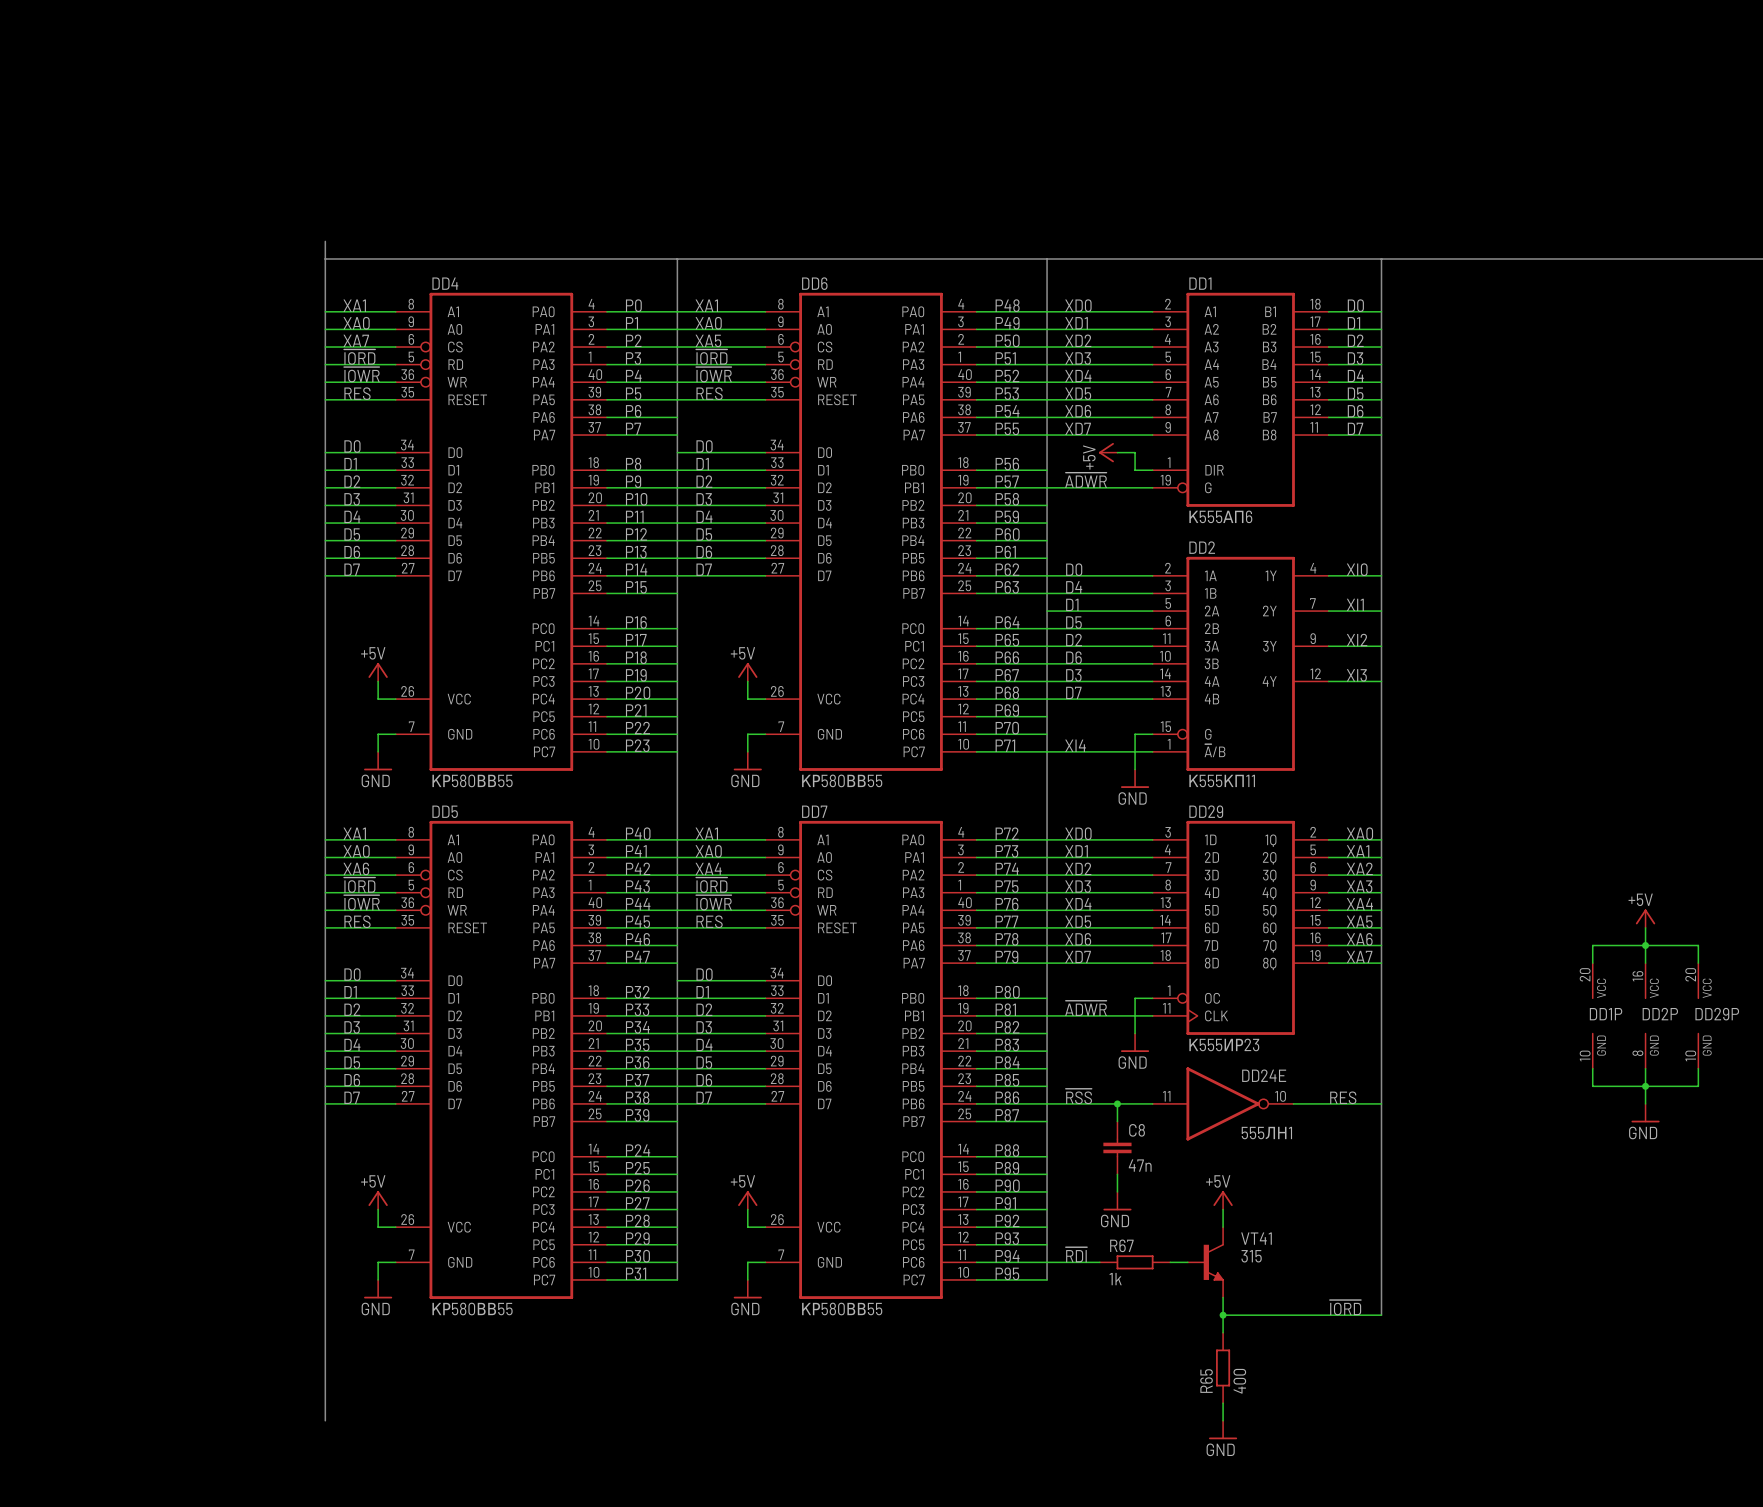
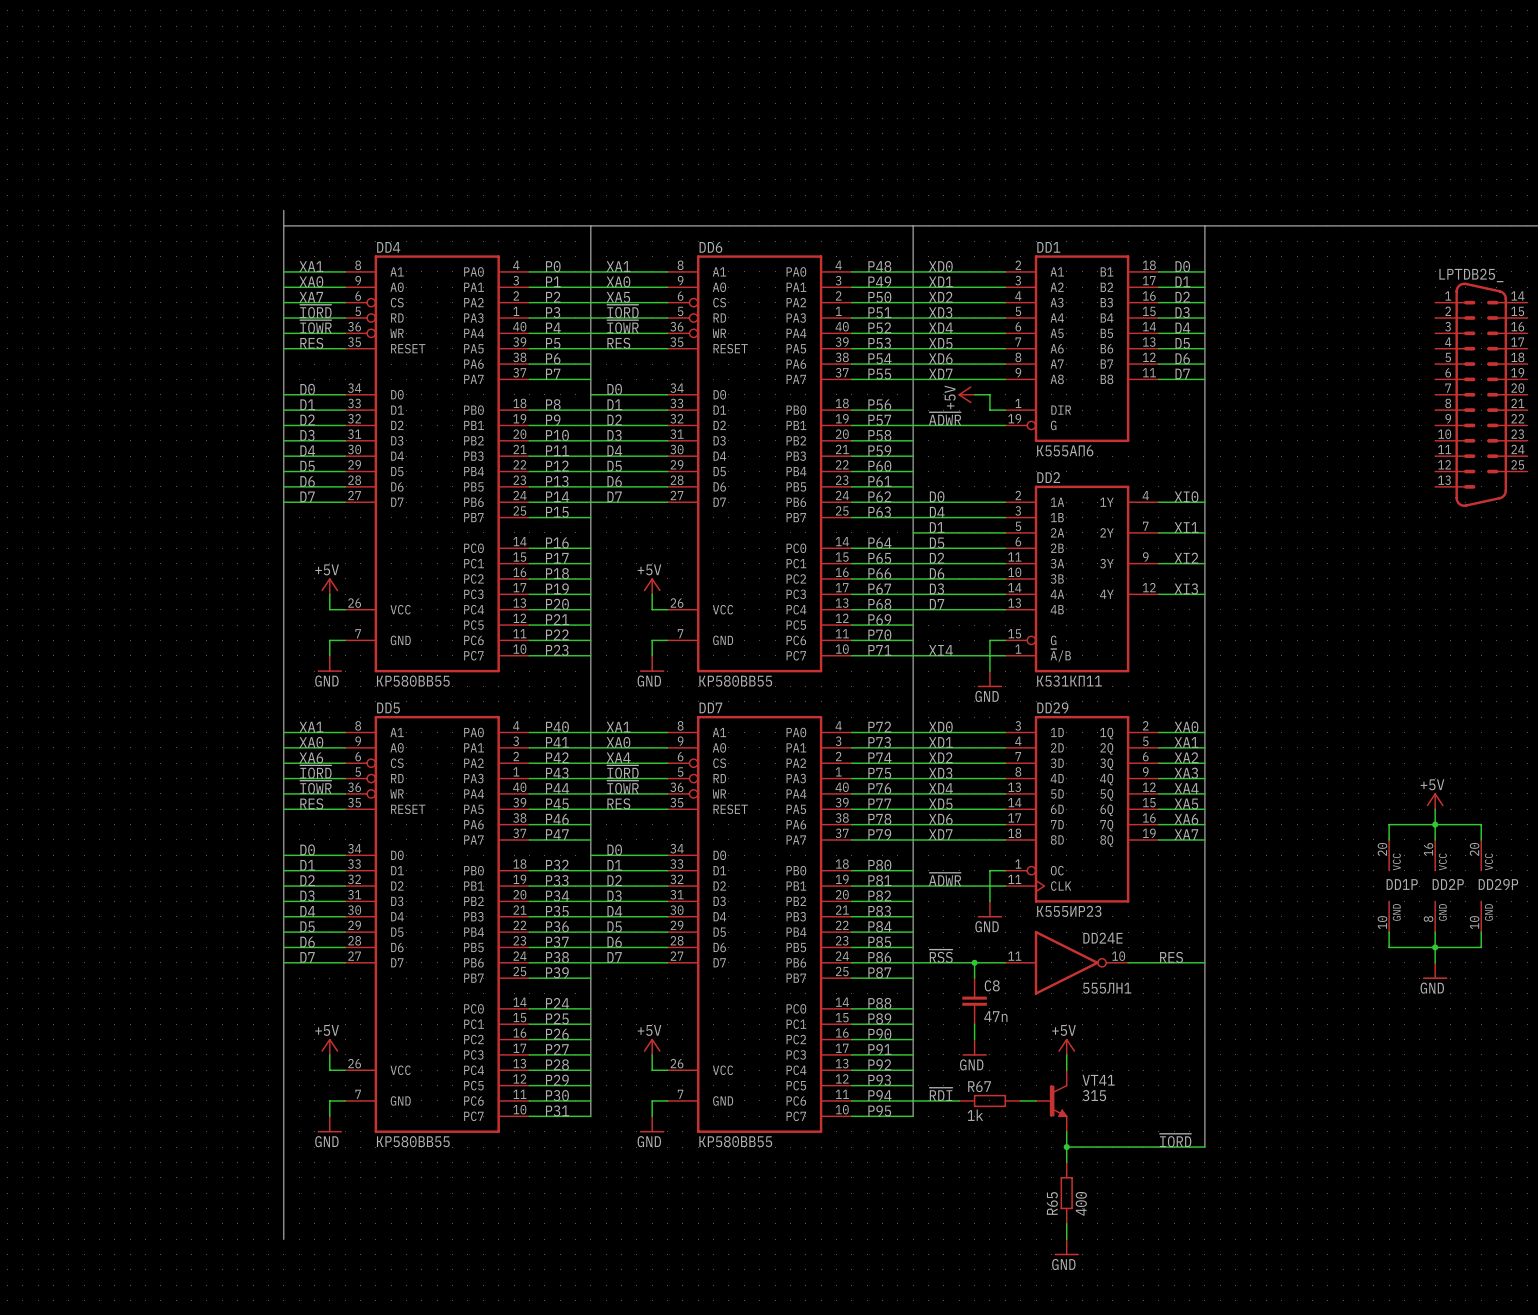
LPTDB25_: none -> (1481, 394)
DD2 value: К555КП11 (1222, 780) -> К531КП11 (1069, 681)

